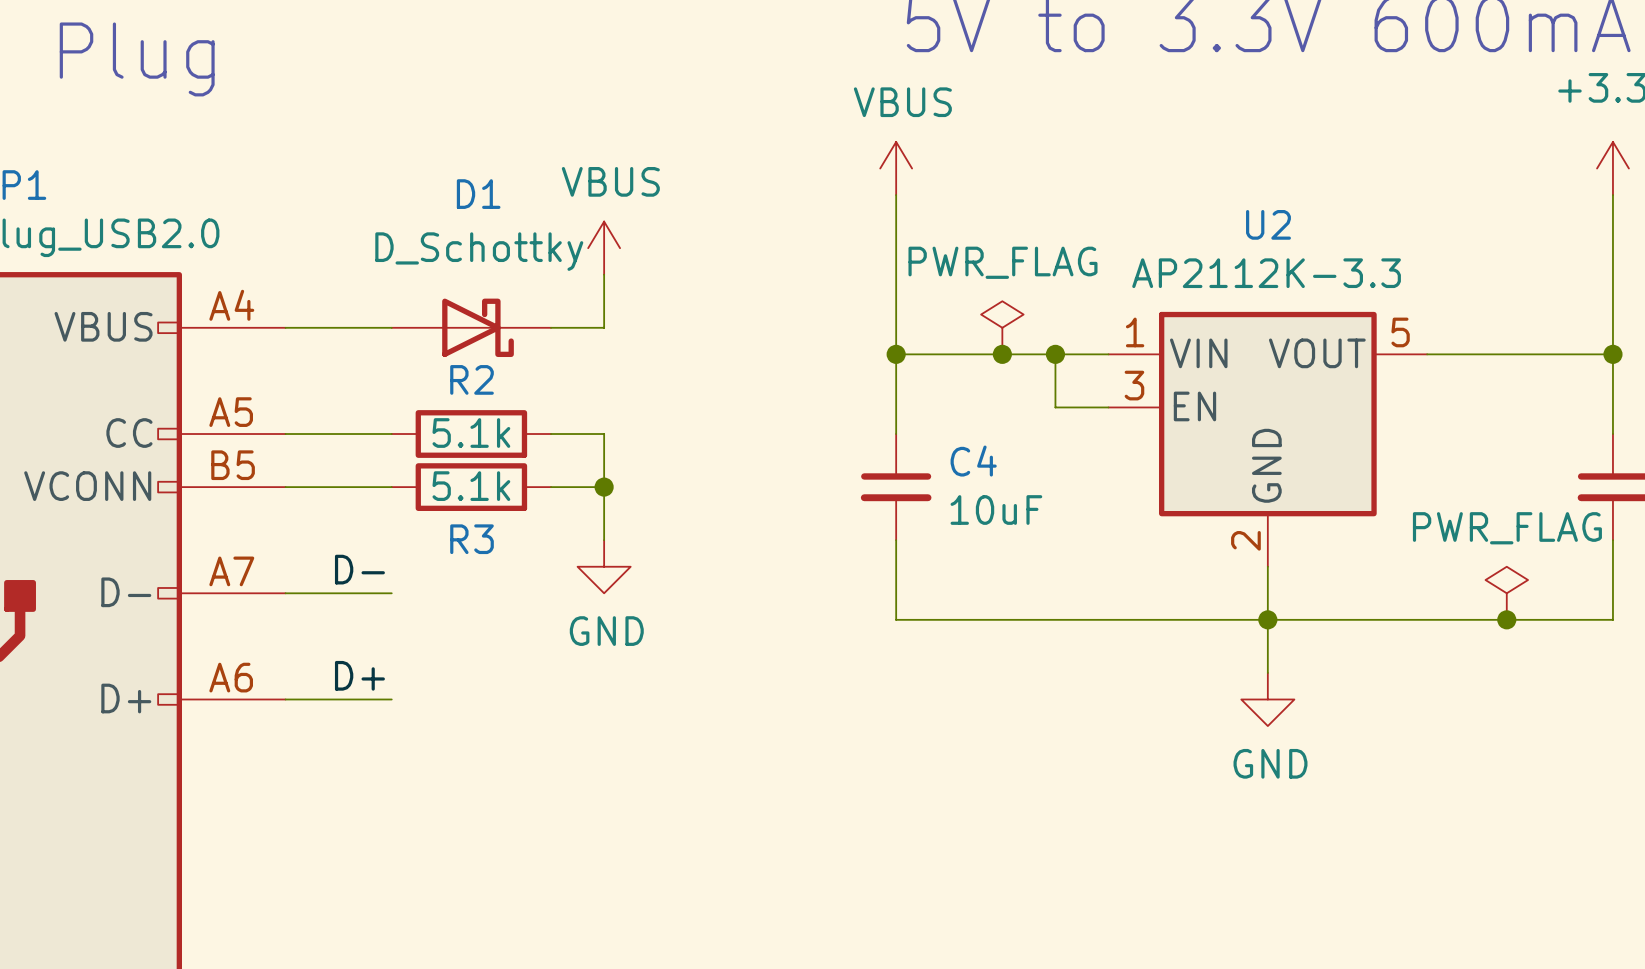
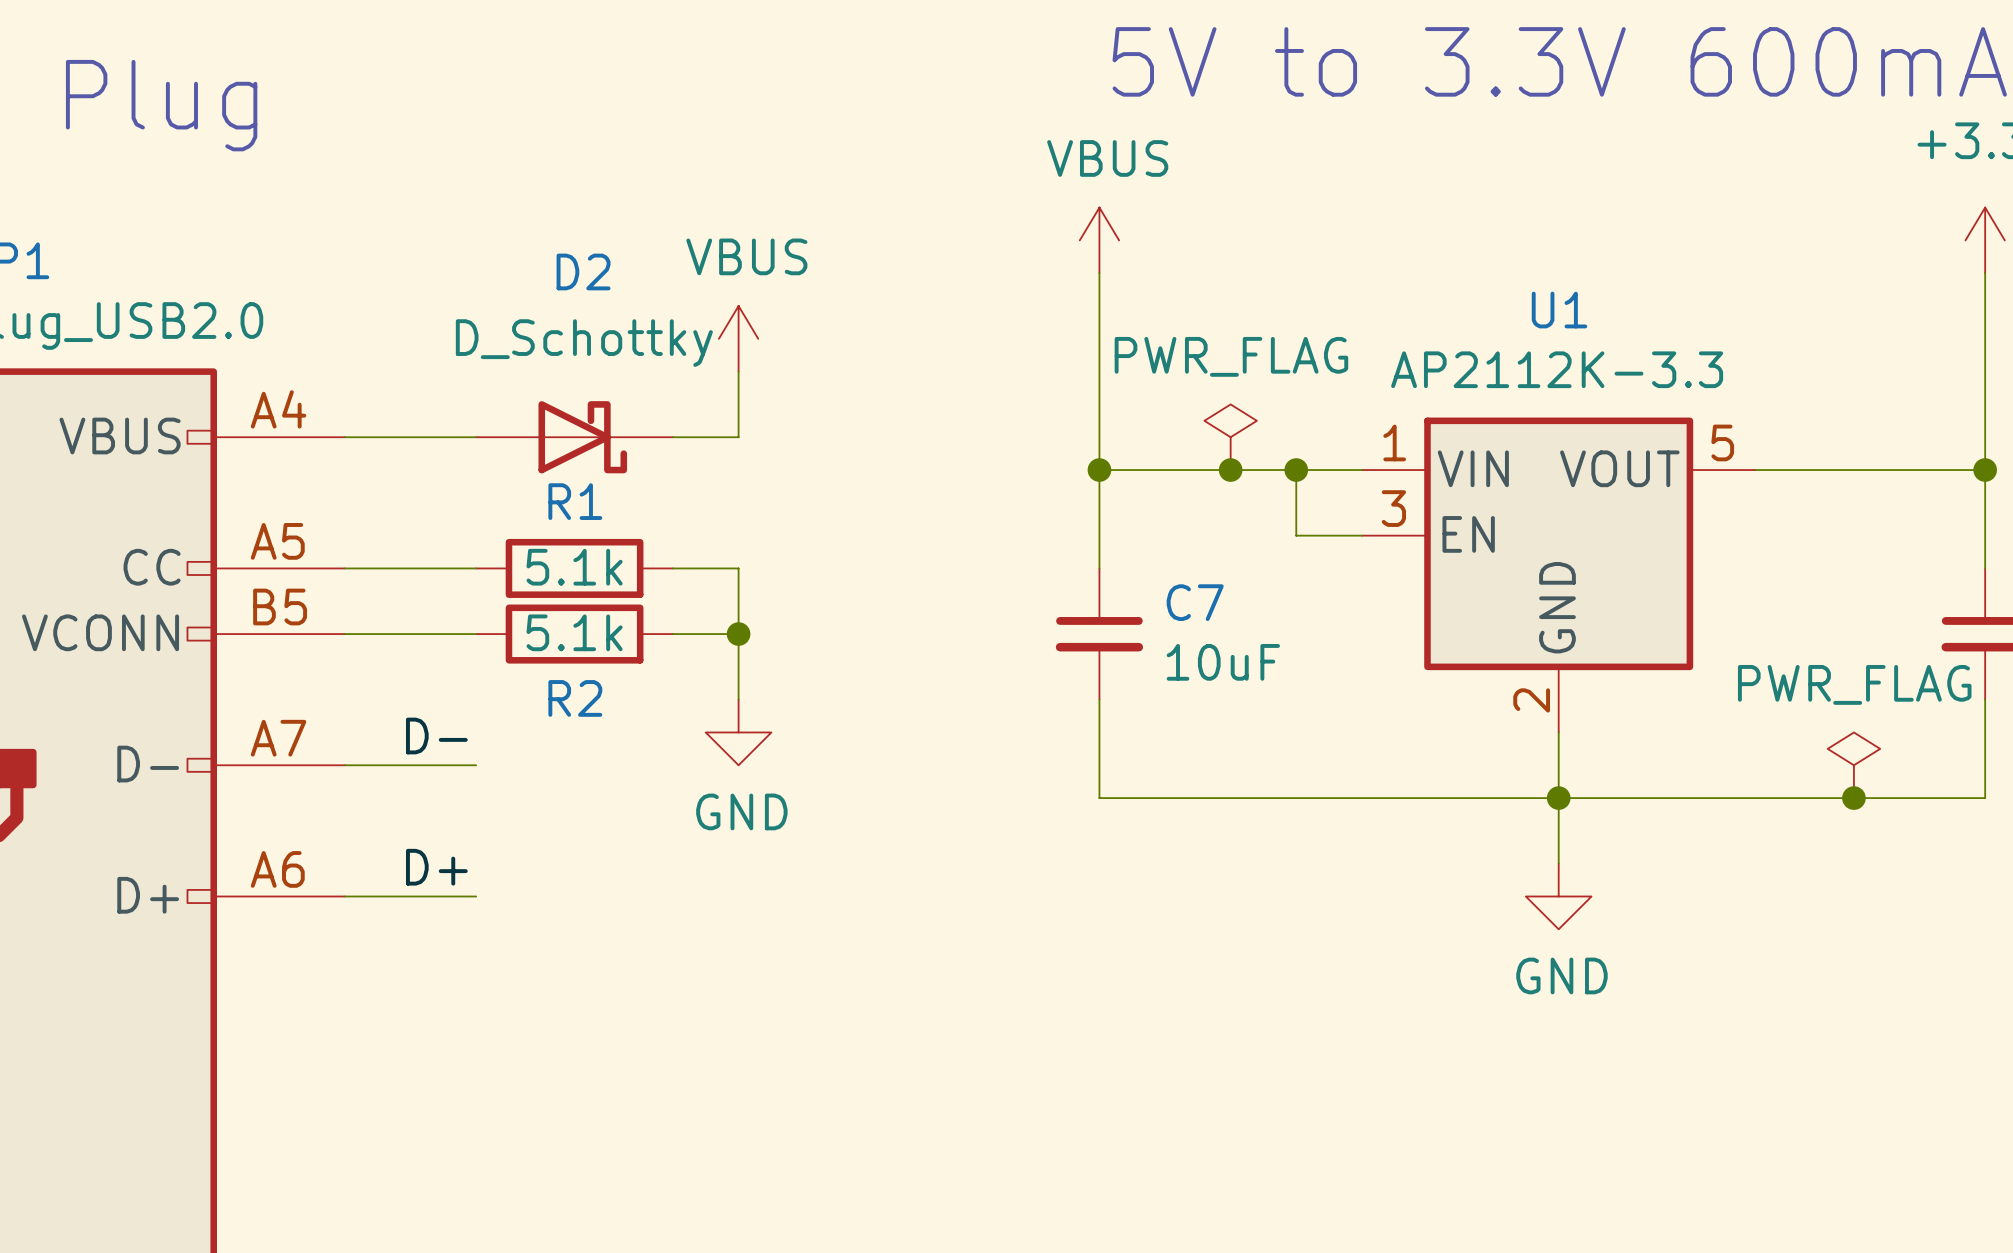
D1 name: D1 (478, 194) -> D2 (583, 271)
U2 name: U2 (1268, 224) -> U1 (1559, 310)
R2 name: R2 (472, 379) -> R1 (575, 501)
C4 name: C4 (973, 461) -> C7 (1195, 602)
R3 name: R3 (472, 539) -> R2 (575, 698)

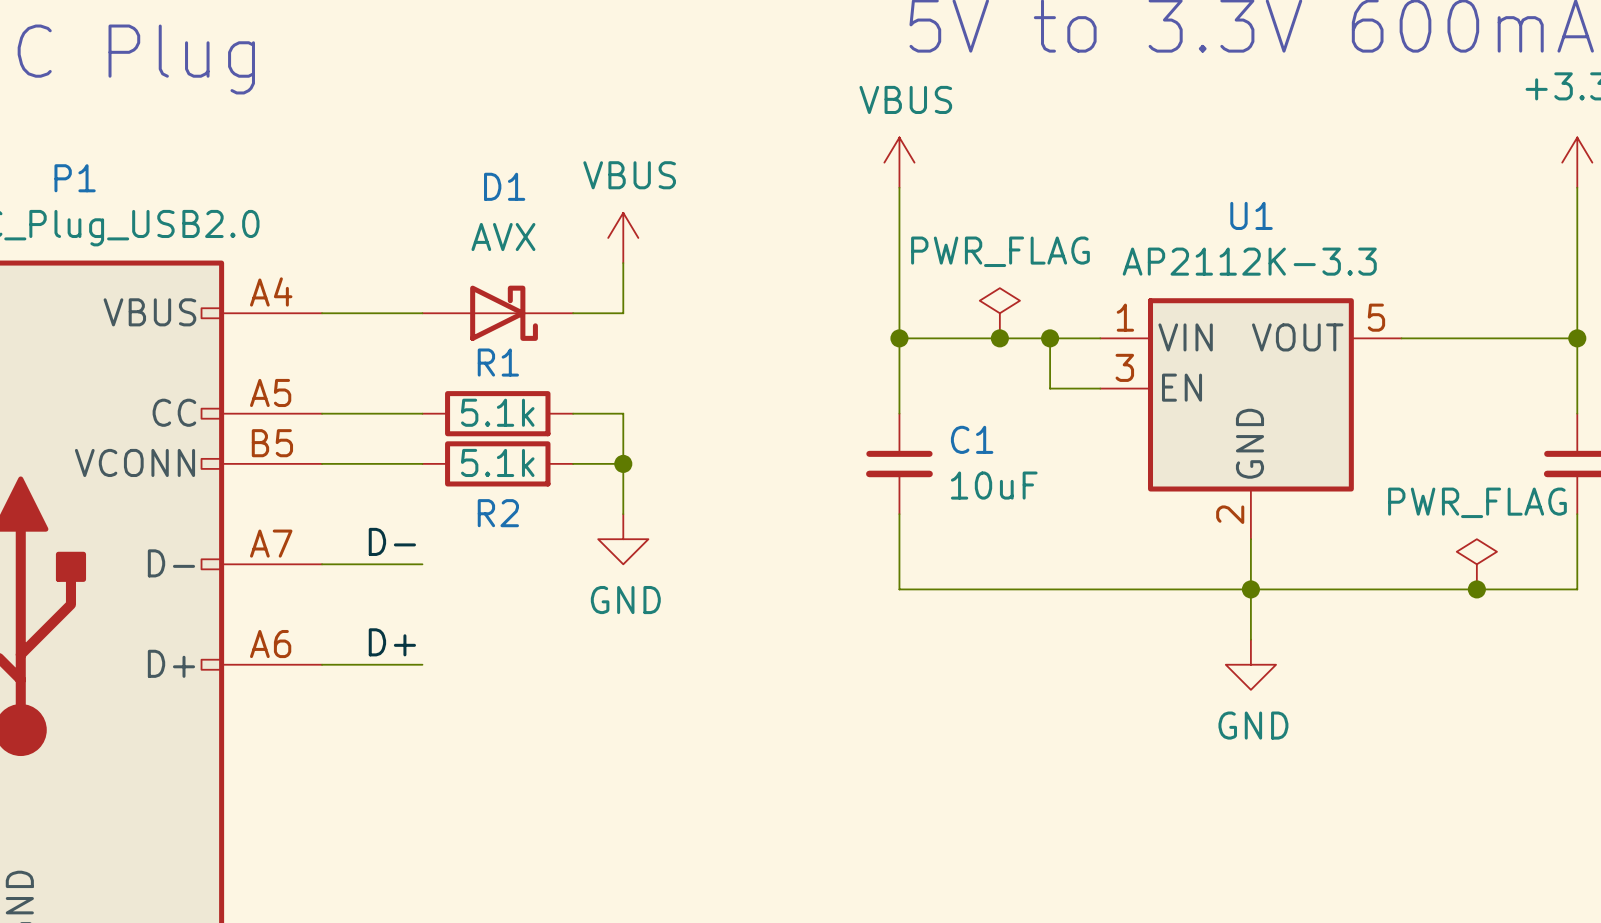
D2 name: D2 (583, 271) -> D1 (504, 186)
D2 value: D_Schottky (584, 343) -> AVX (503, 237)
C7 name: C7 (1195, 602) -> C1 (972, 439)

